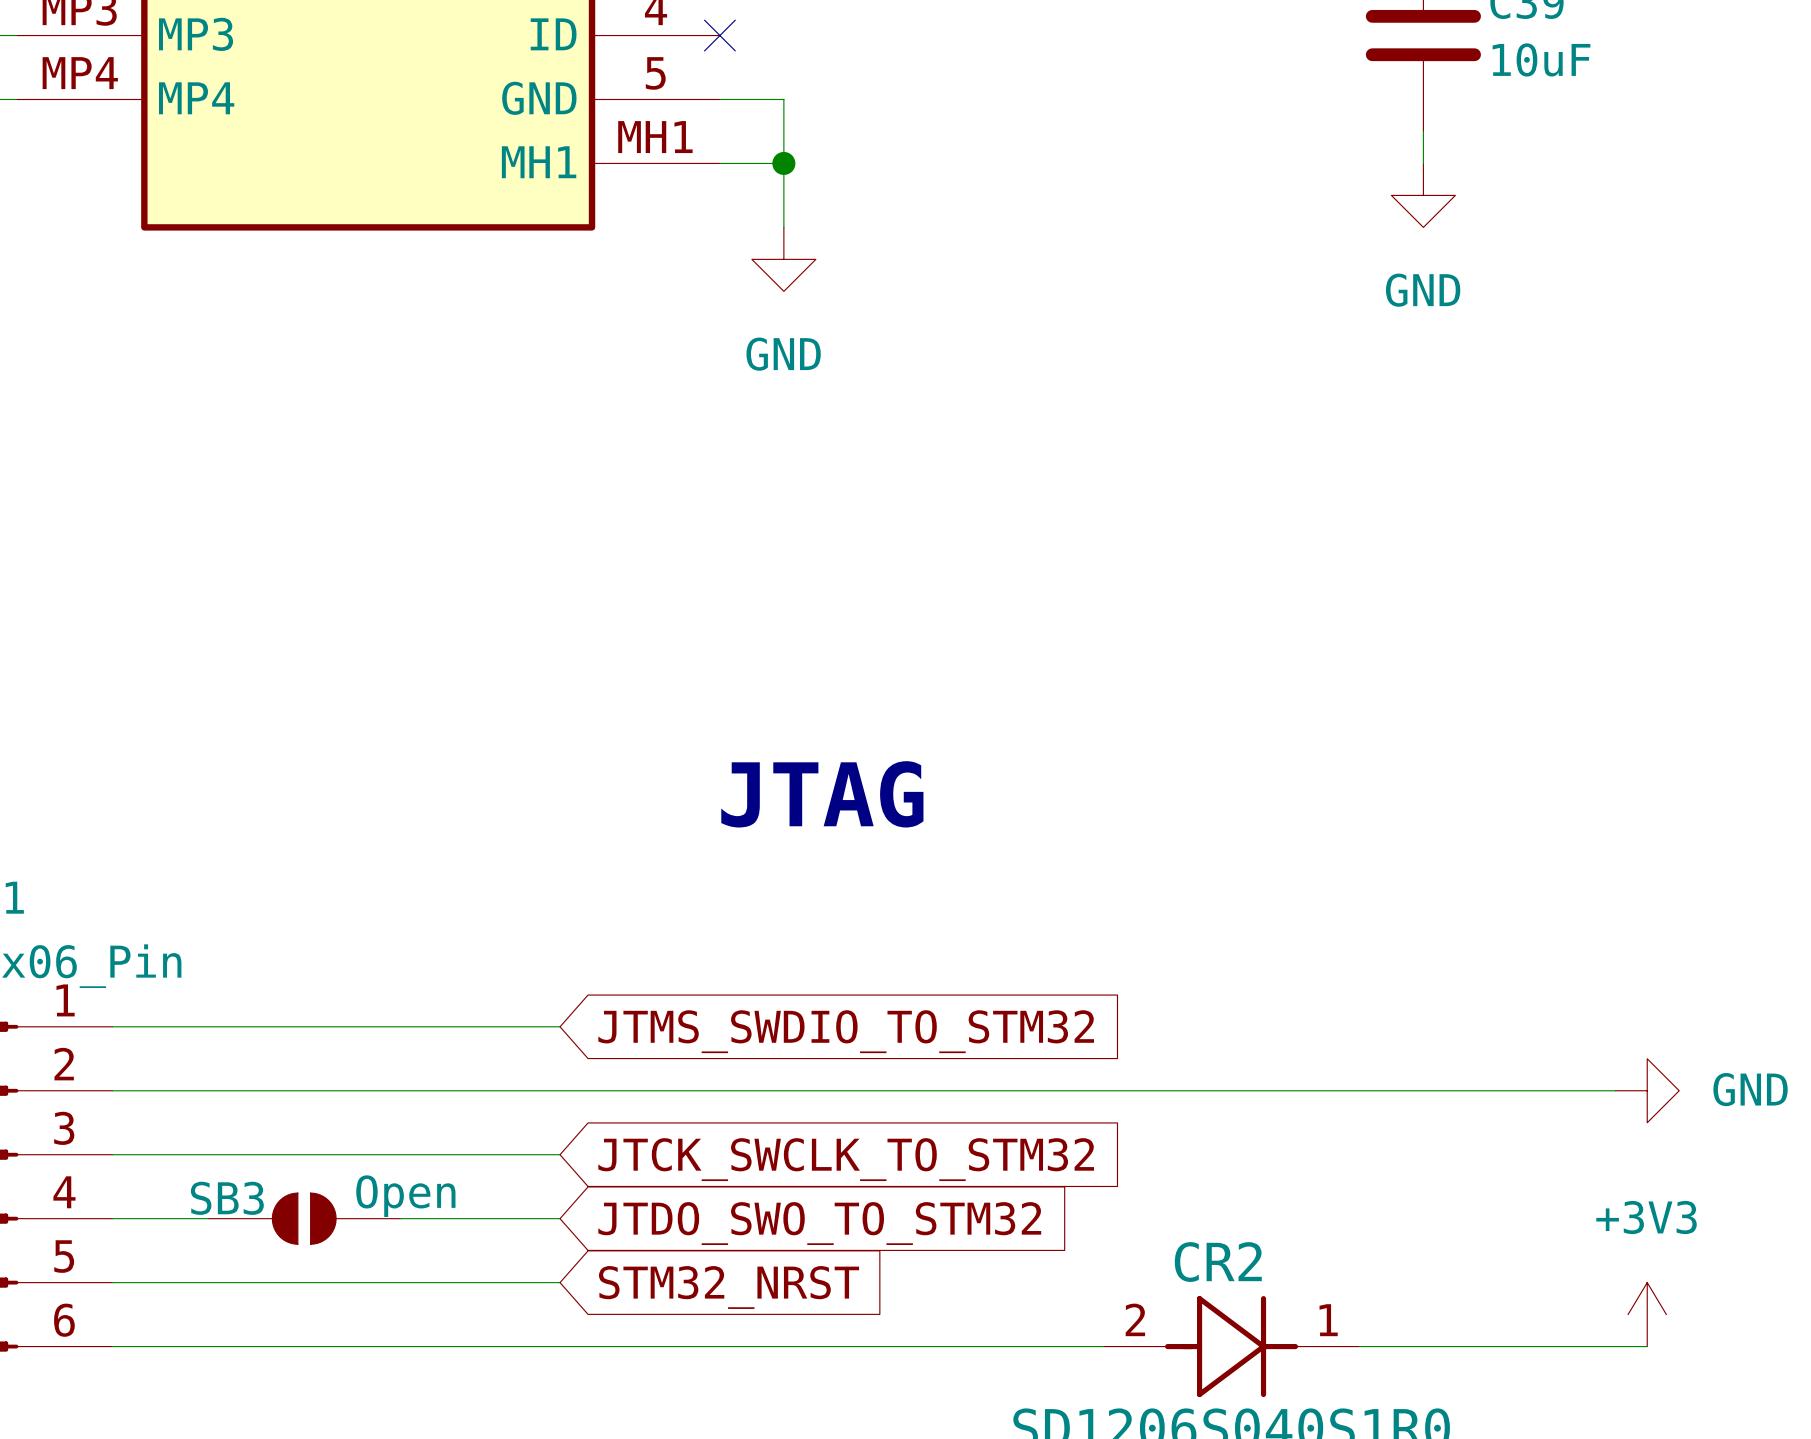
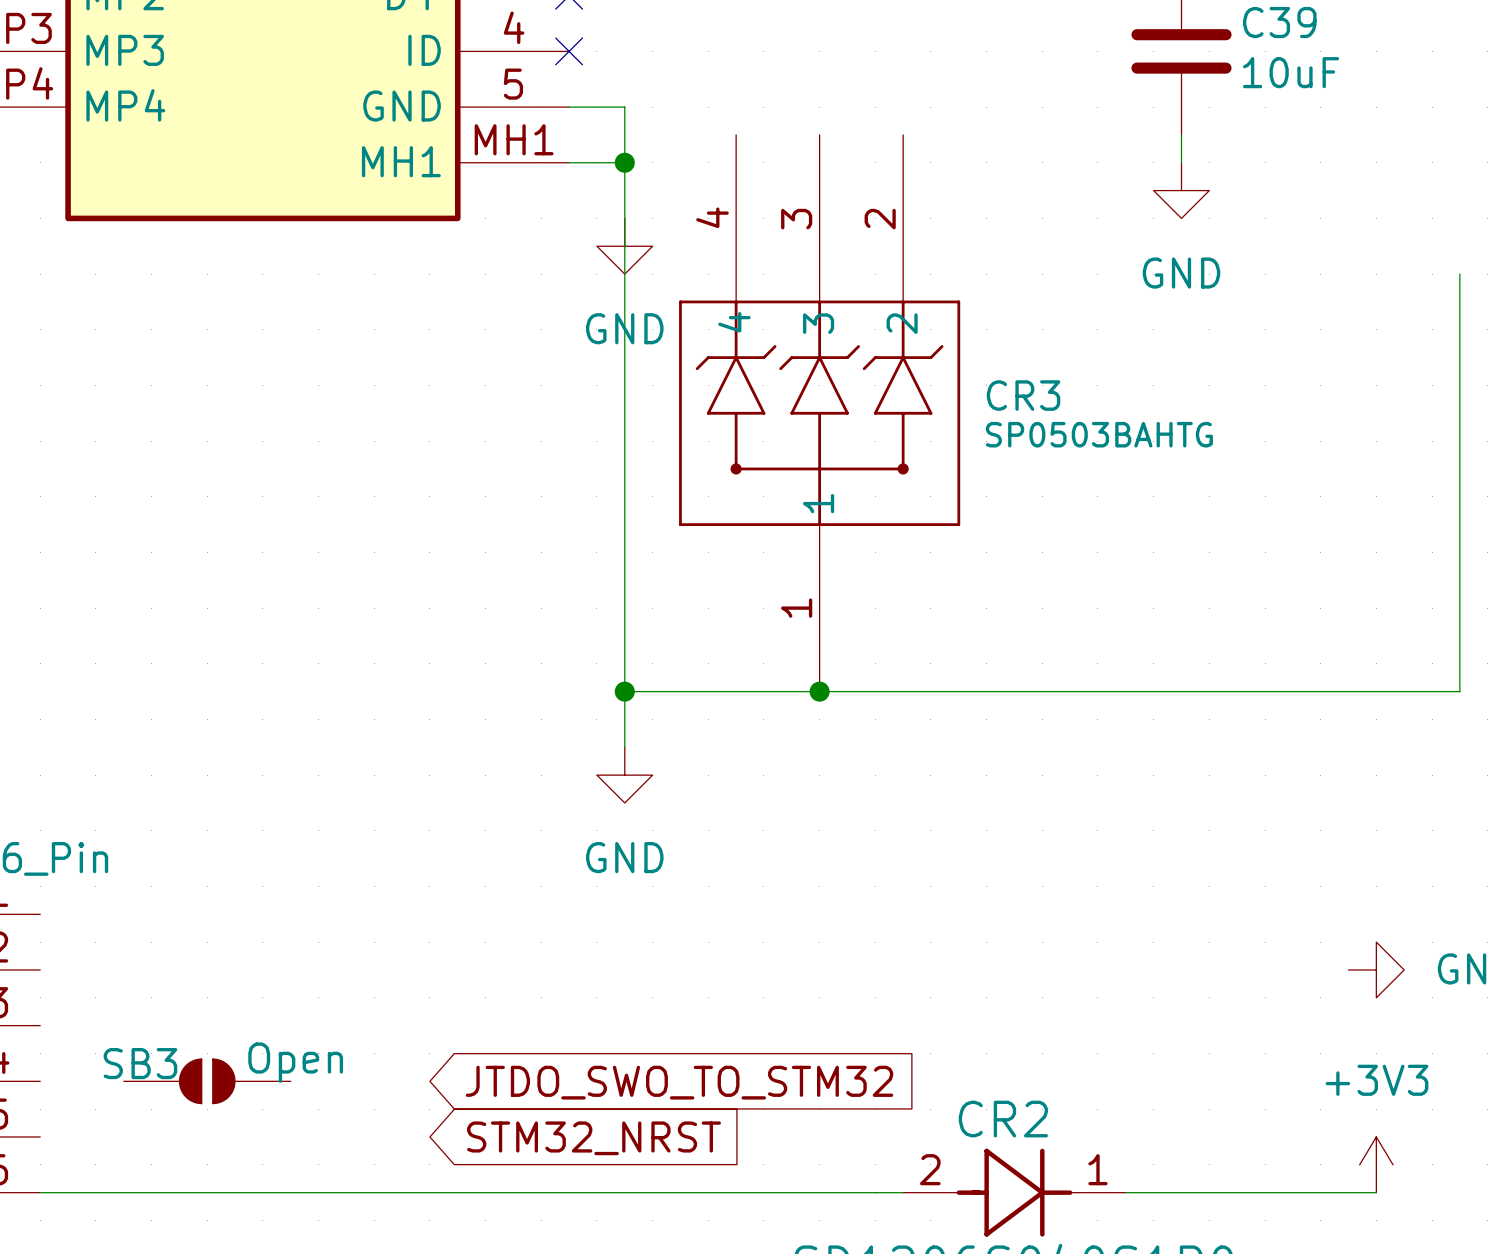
wire: none -> (624, 218) (624, 747)
wire: none -> (1459, 274) (1459, 691) (624, 691)
CR3: none -> SP0503BAHTG (819, 413)
junction: none -> (624, 691)
junction: none -> (819, 691)
text: JTAG (822, 794) -> none
power symbol: none -> GND (624, 775)
wire: (112, 1026) (560, 1026) -> none
global label: JTMS_SWDIO_TO_STM32 (846, 1031) -> none
wire: (112, 1090) (1615, 1090) -> none
wire: (112, 1154) (560, 1154) -> none
global label: JTCK_SWCLK_TO_STM32 (846, 1159) -> none
wire: (112, 1218) (208, 1218) -> none
wire: (400, 1218) (560, 1218) -> none
wire: (112, 1282) (560, 1282) -> none

